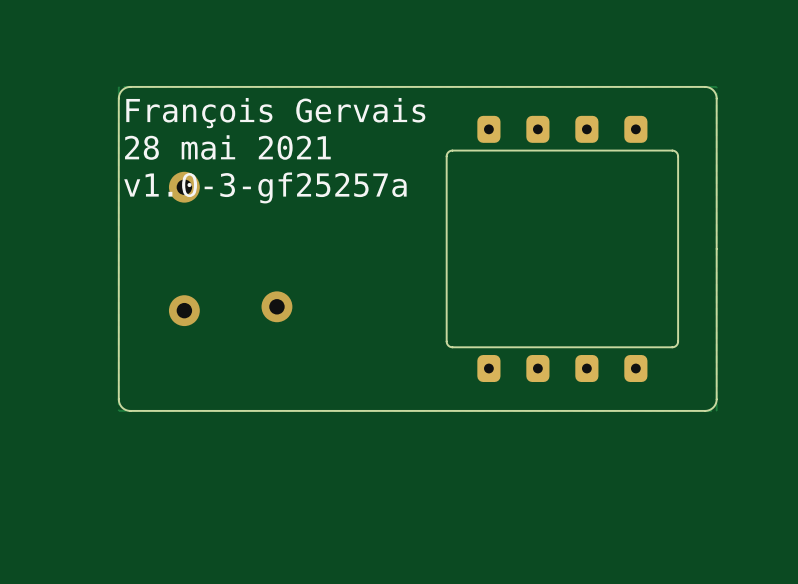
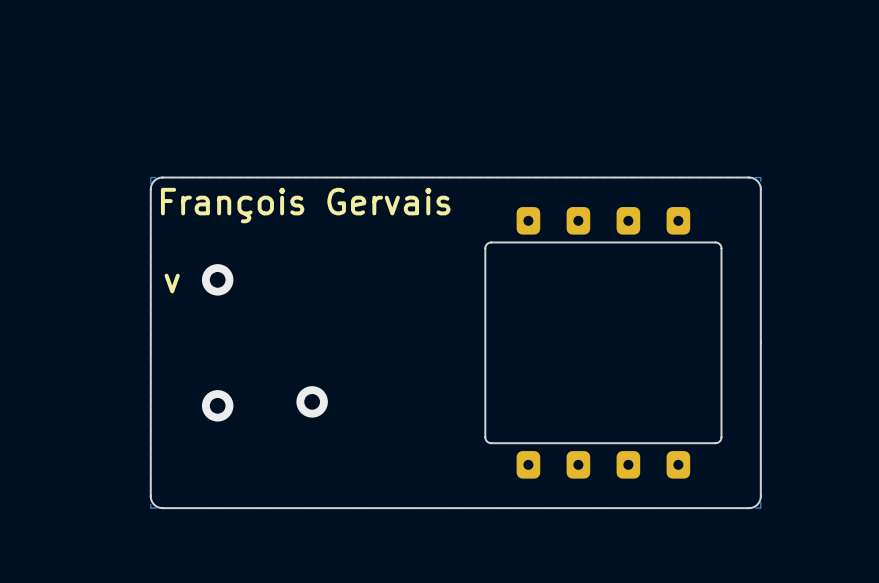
text: 28 mai 2021 (227, 147) -> none
text: v1.0-3-gf25257a (265, 187) -> v (172, 283)

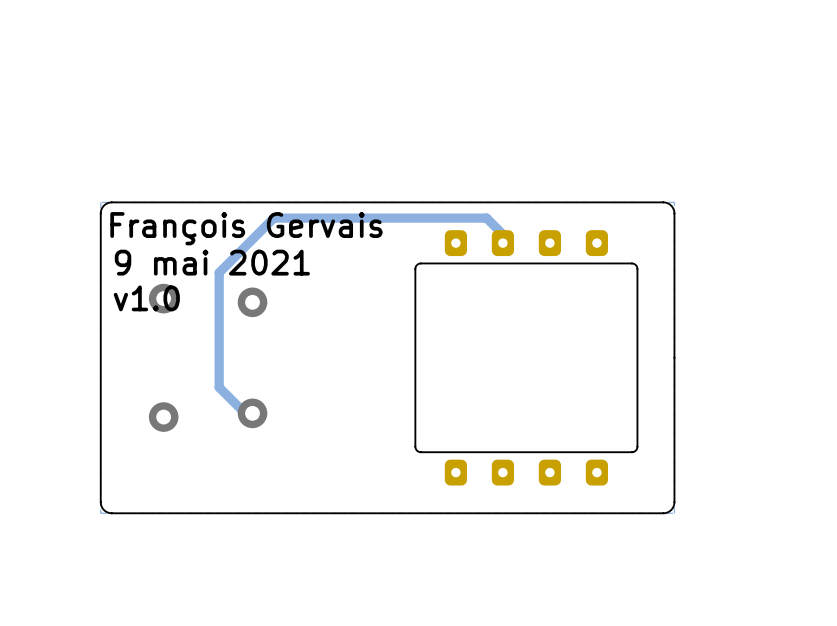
track: none -> (502, 243) (502, 234) (486, 218) (273, 218) (219, 272) (219, 387) (245, 413) (252, 413)
text: none -> 9 mai 2021 (212, 262)
text: v (172, 283) -> v1.0 (146, 298)
via: none -> (252, 302)

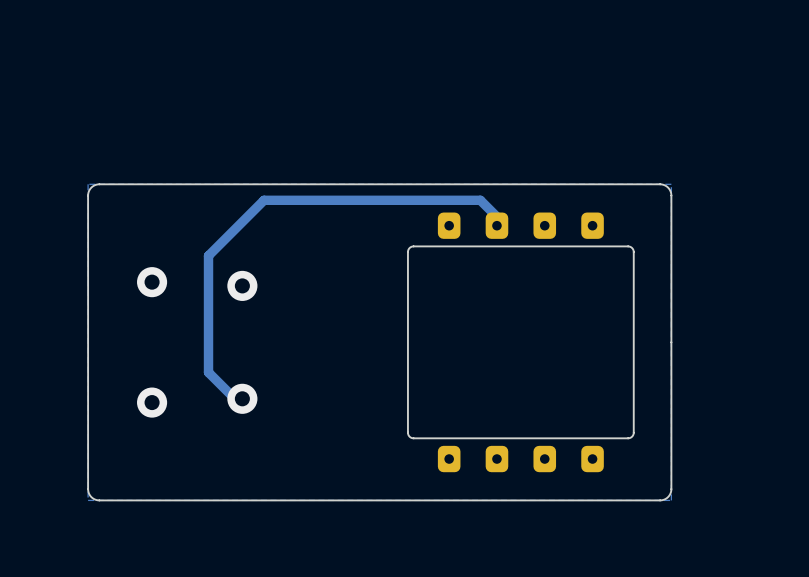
text: François Gervais (246, 228) -> none
text: 9 mai 2021 (212, 262) -> none
text: v1.0 (146, 298) -> none

